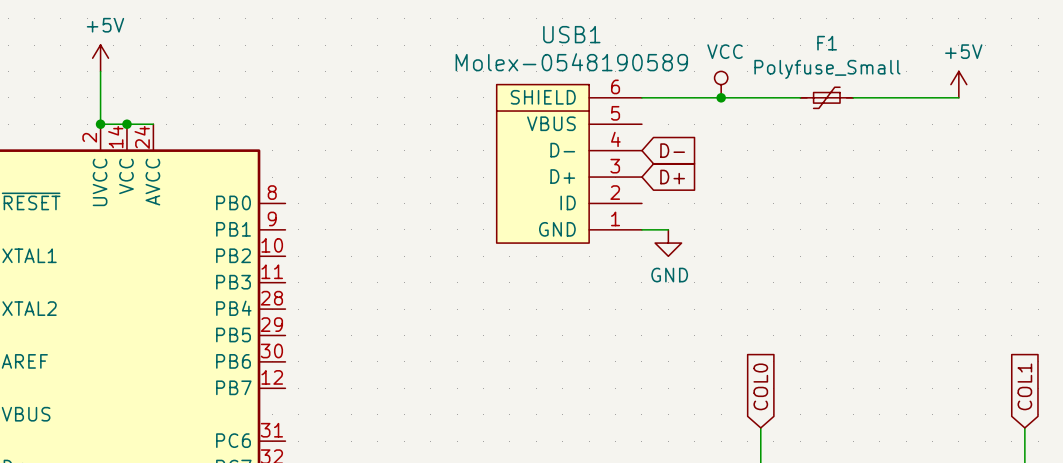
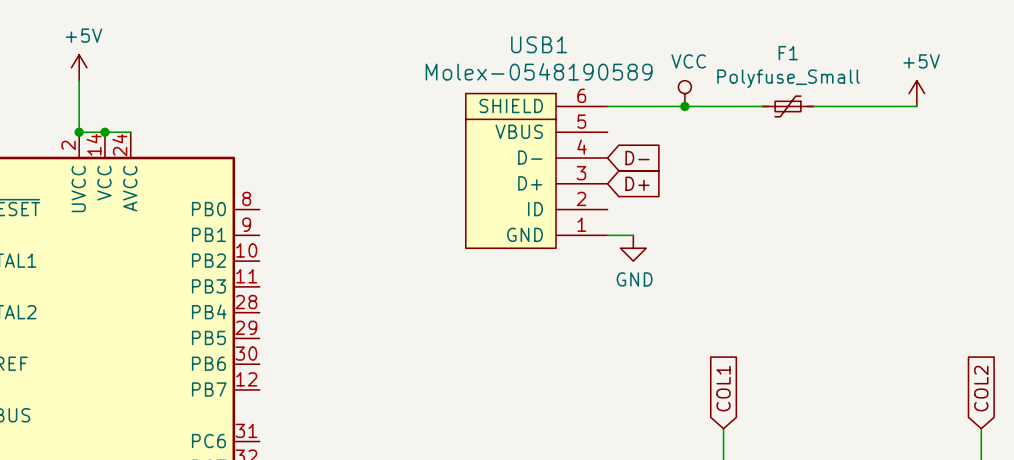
global label: COL0 (760, 386) -> COL1 (723, 388)
global label: COL1 (1024, 386) -> COL2 (981, 388)

